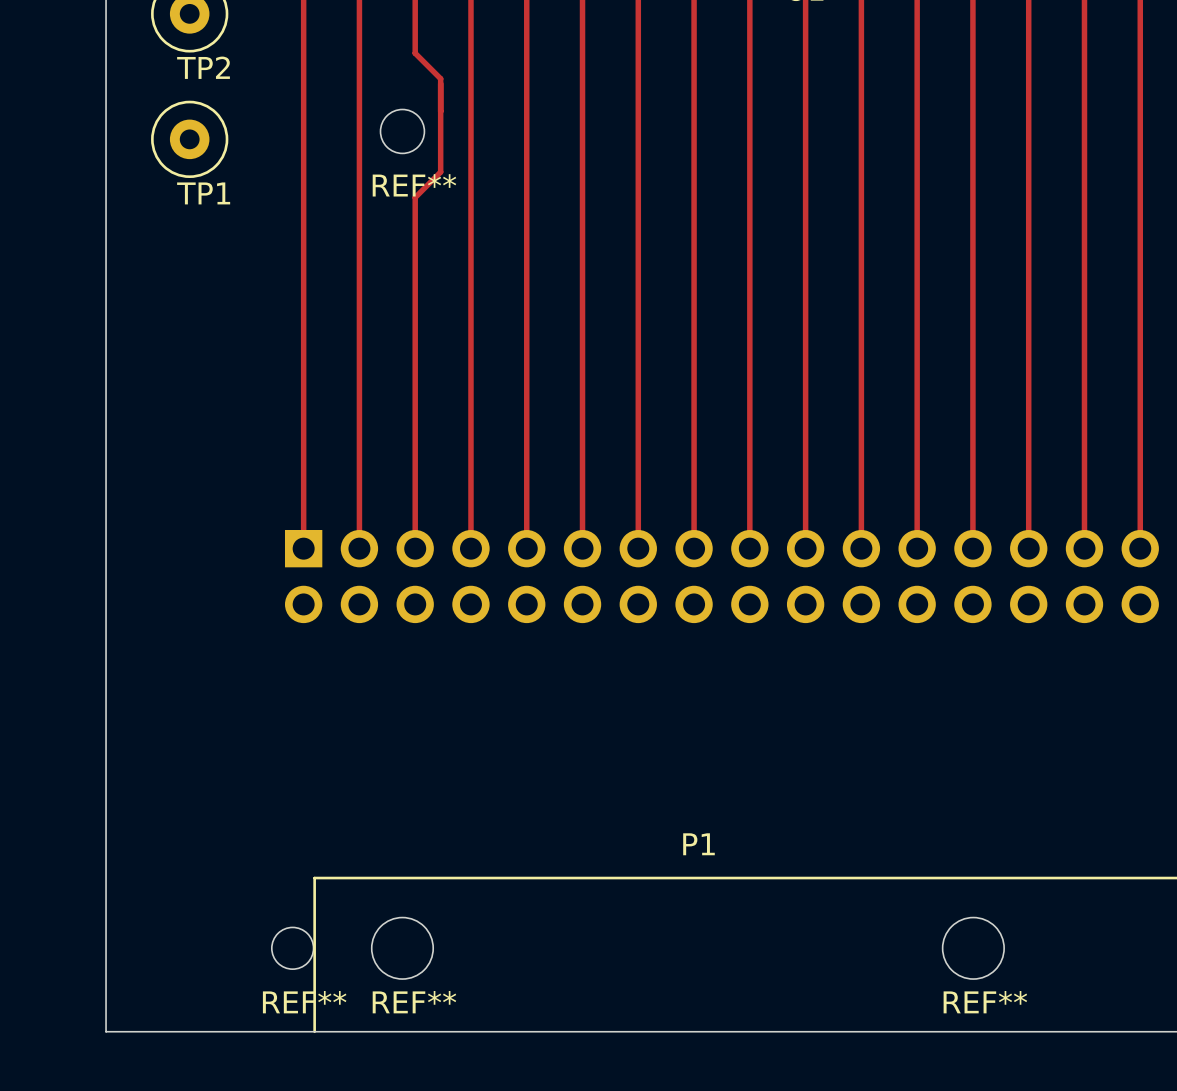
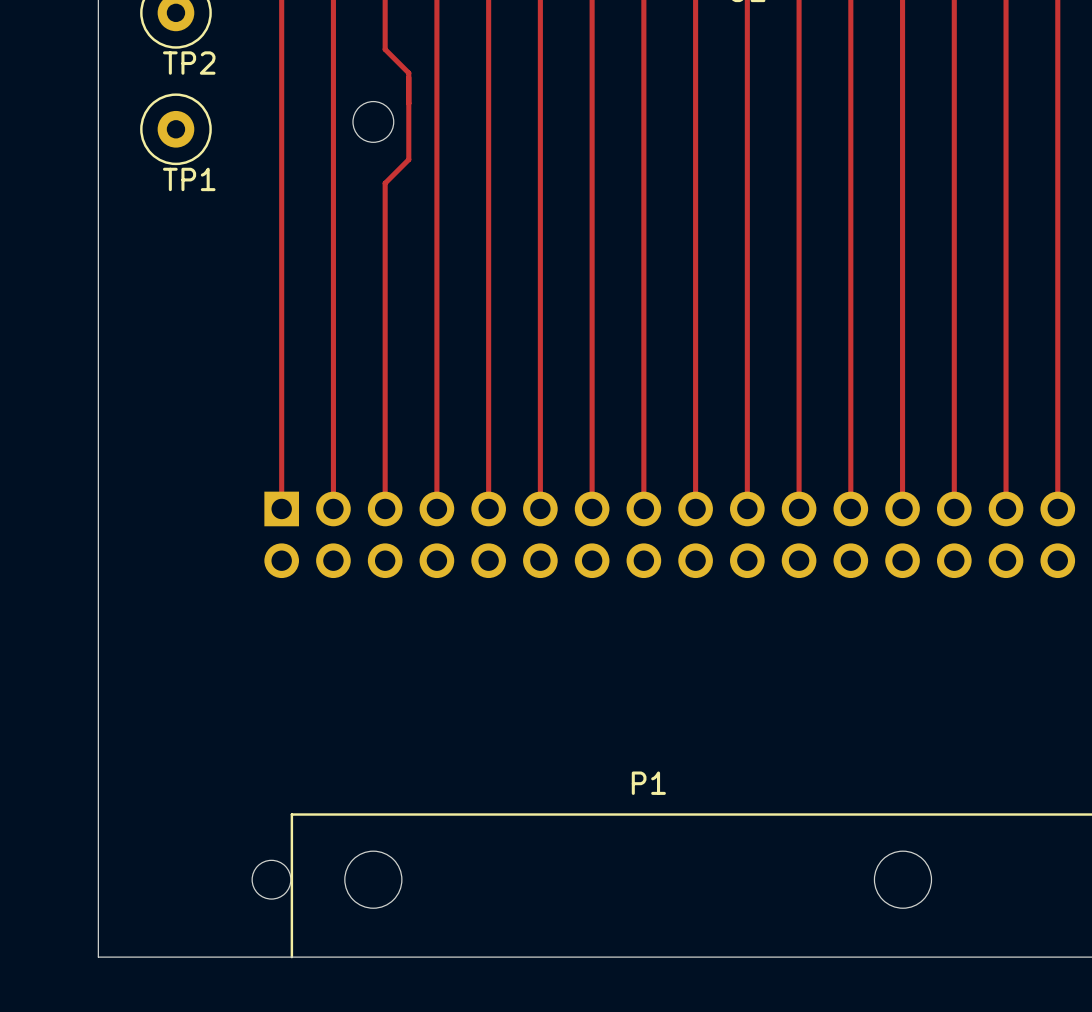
REF** name: REF** (414, 185) -> none
REF** name: REF** (304, 1002) -> none
REF** name: REF** (414, 1002) -> none
REF** name: REF** (985, 1002) -> none

